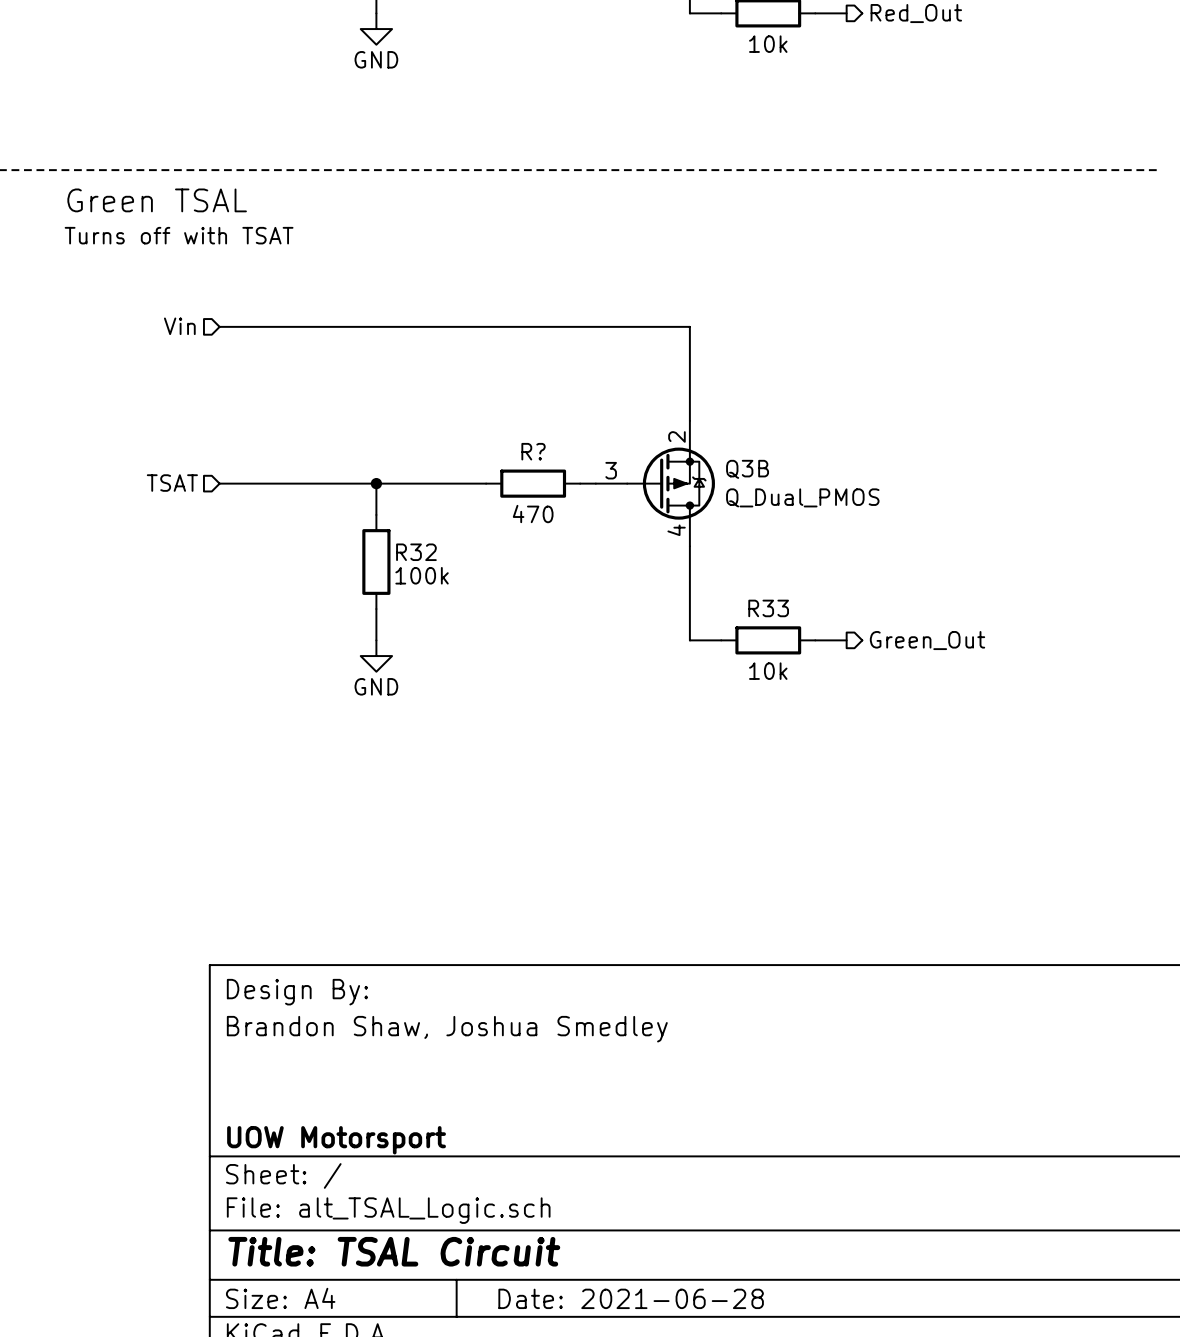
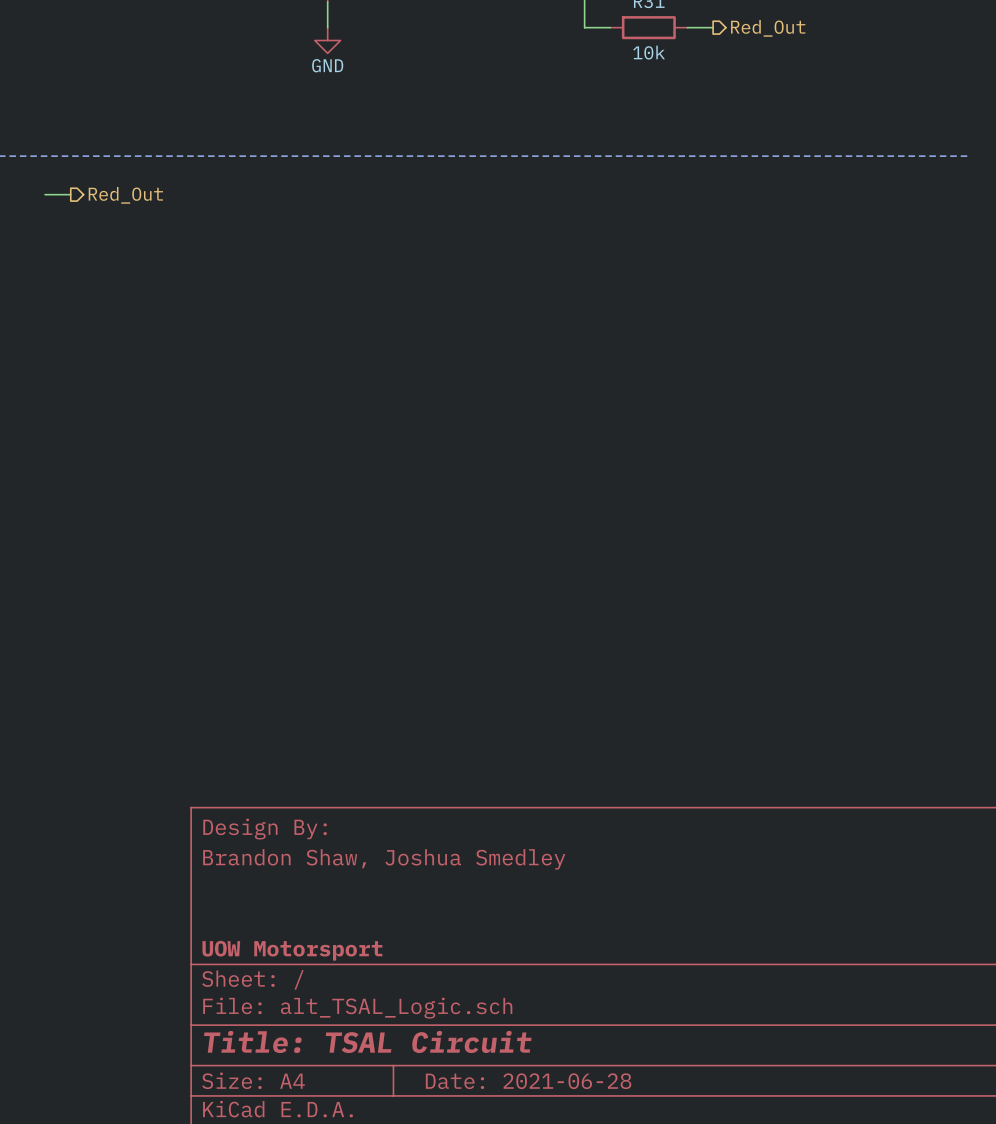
text: Green TSAL (157, 200) -> none
wire: none -> (45, 194) (70, 194)
hierarchical label: none -> Red_Out (125, 195)
text: Turns off with TSAT (179, 235) -> none
hierarchical label: Vin (179, 326) -> none
wire: (219, 326) (689, 326) (689, 420) -> none
hierarchical label: TSAT (172, 483) -> none
wire: (219, 483) (486, 483) -> none
wire: (376, 483) (376, 514) -> none
junction: (376, 483) -> none
R?: 470 (533, 483) -> none
wire: (580, 483) (595, 483) -> none
Q3B: Q_Dual_PMOS (655, 483) -> none
wire: (689, 546) (689, 640) (721, 640) -> none
R32: 100k (376, 562) -> none
wire: (376, 609) (376, 640) -> none
R33: 10k (768, 640) -> none
wire: (815, 640) (846, 640) -> none
hierarchical label: Green_Out (927, 640) -> none
power symbol: GND (376, 656) -> none

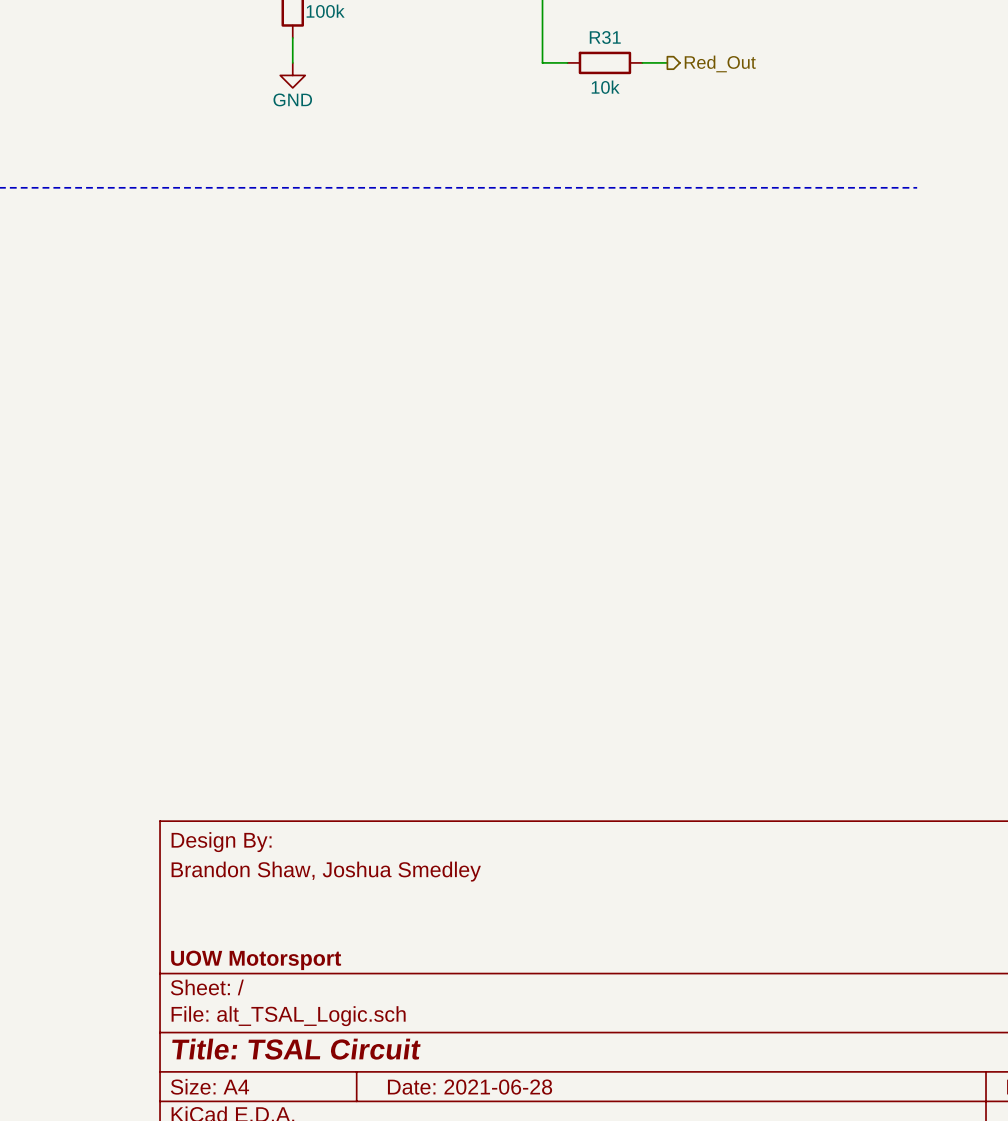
wire: (45, 194) (70, 194) -> none
hierarchical label: Red_Out (125, 195) -> none

